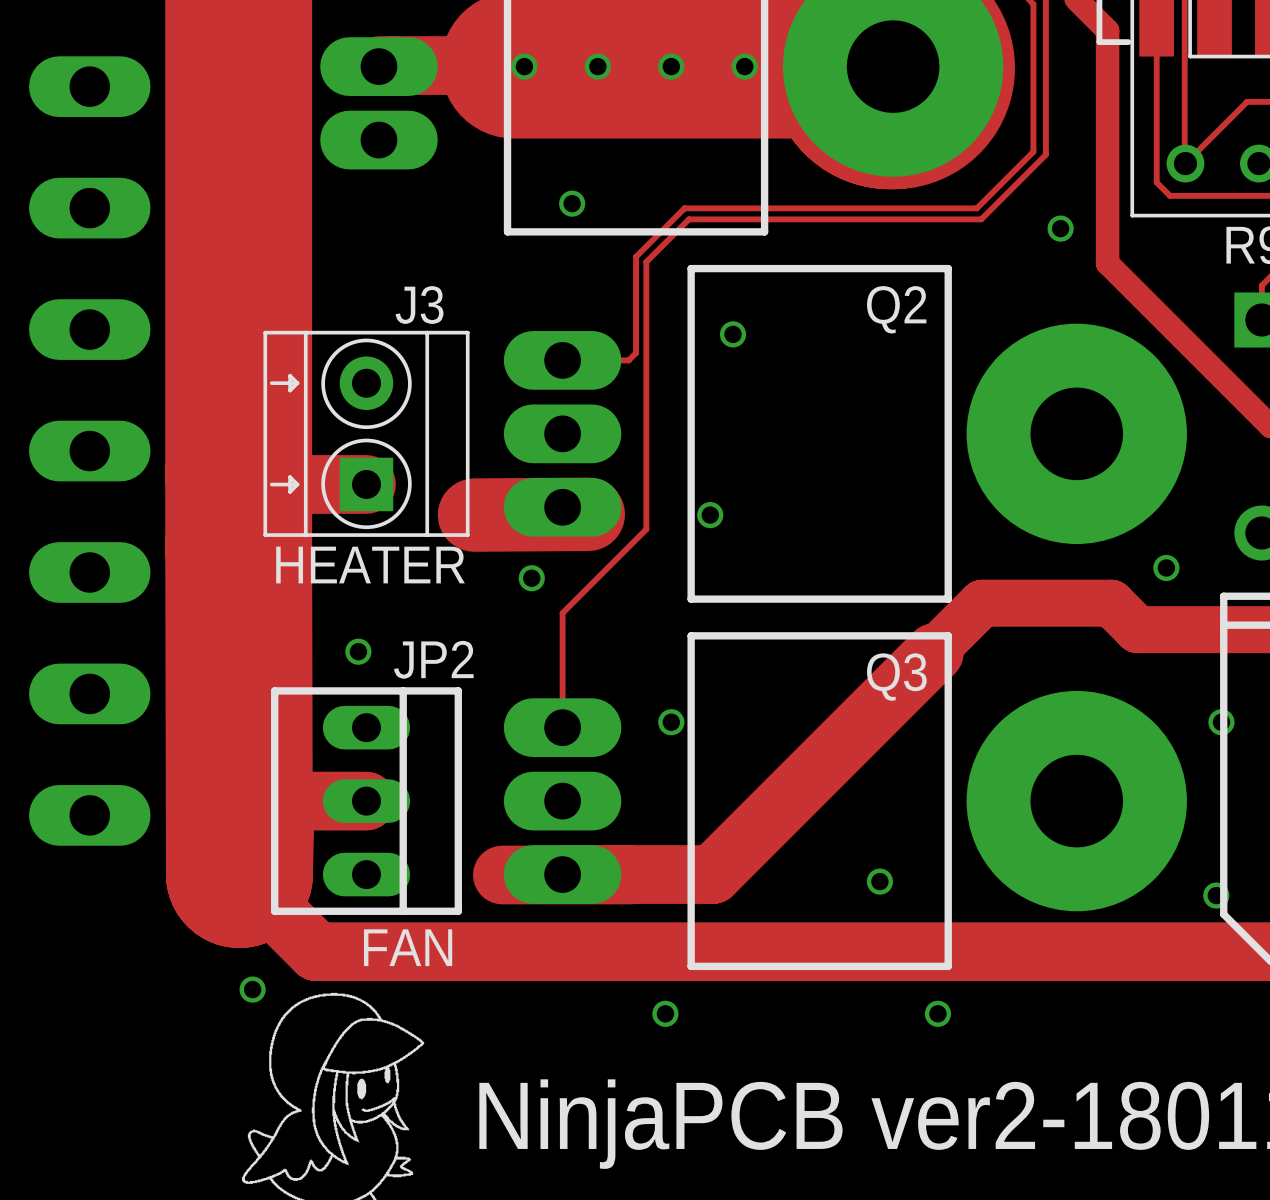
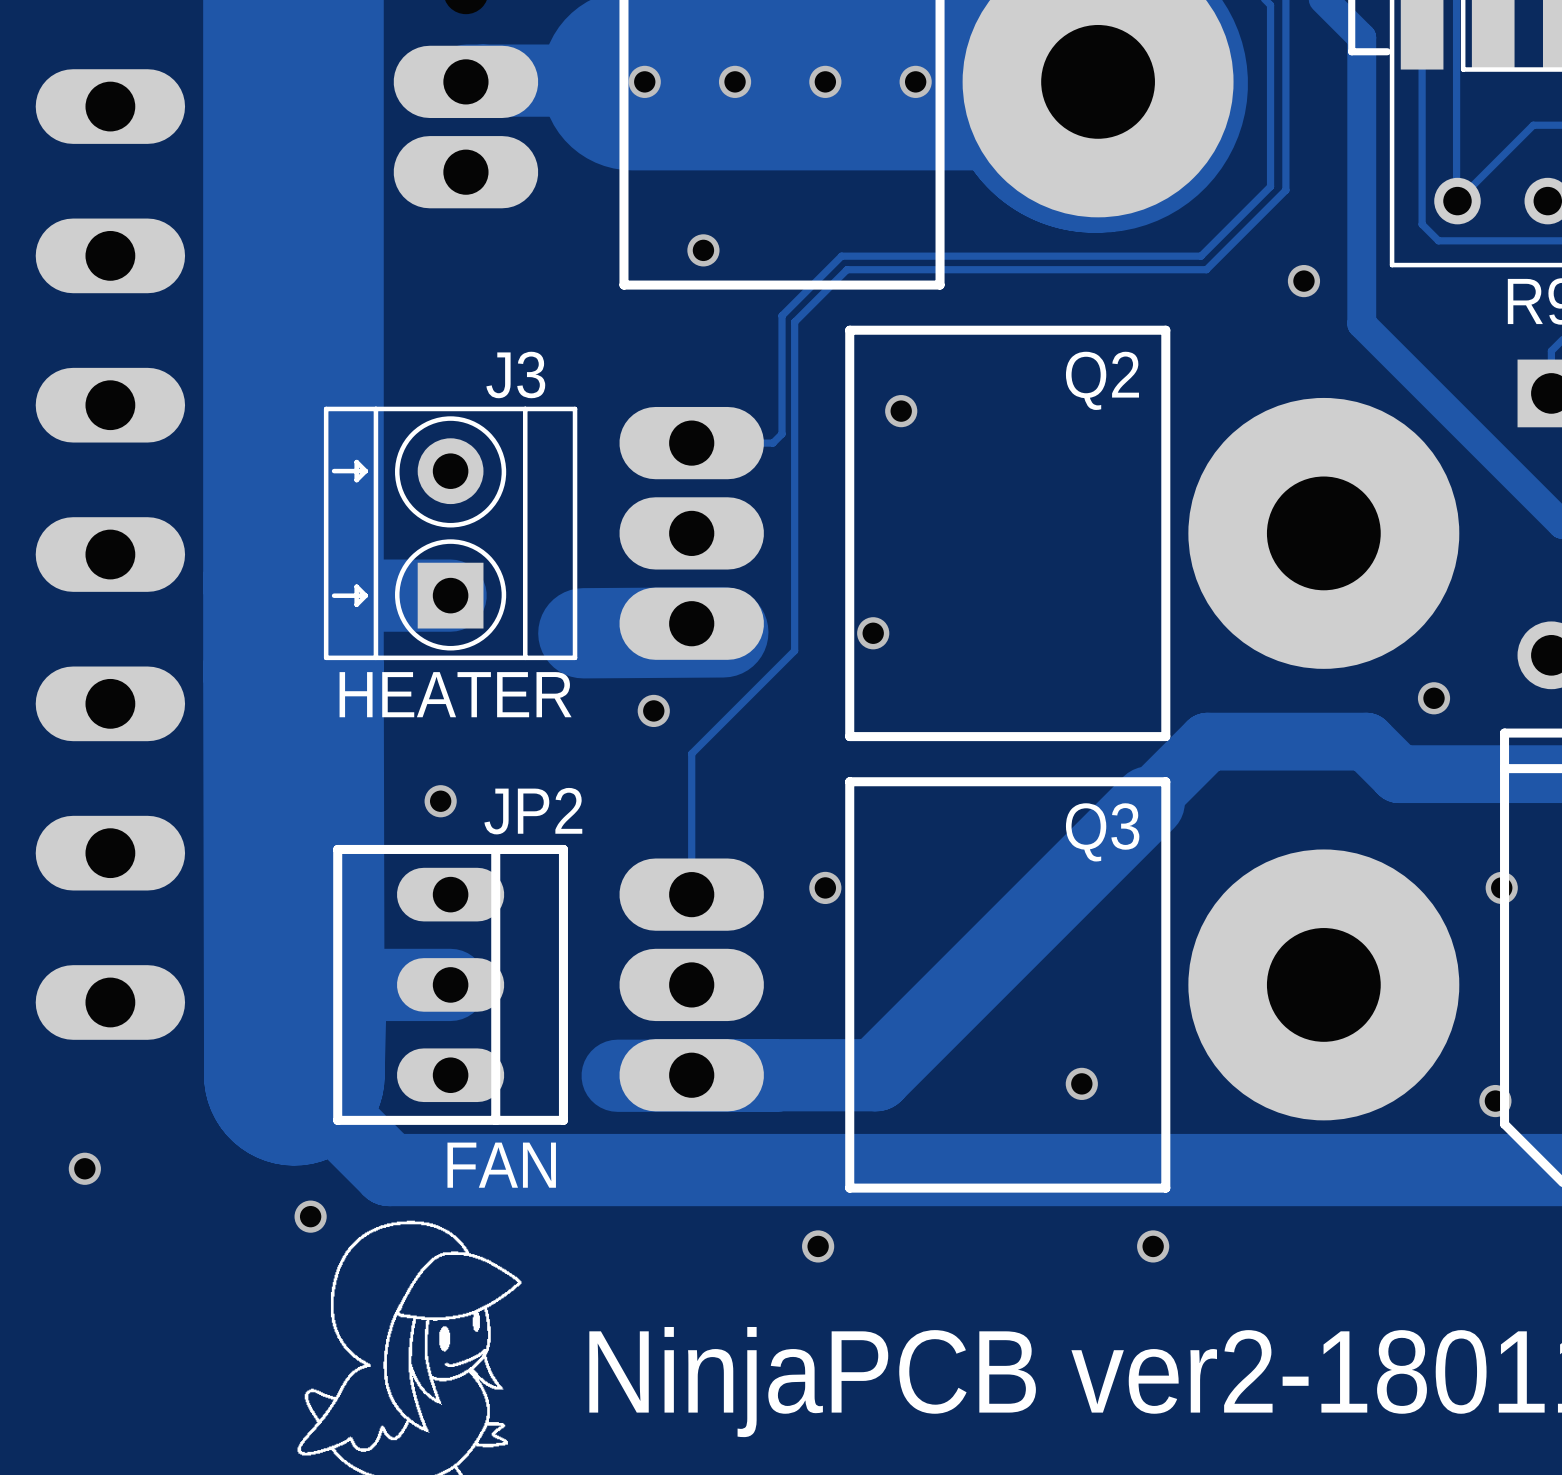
via: none -> (84, 1168)

